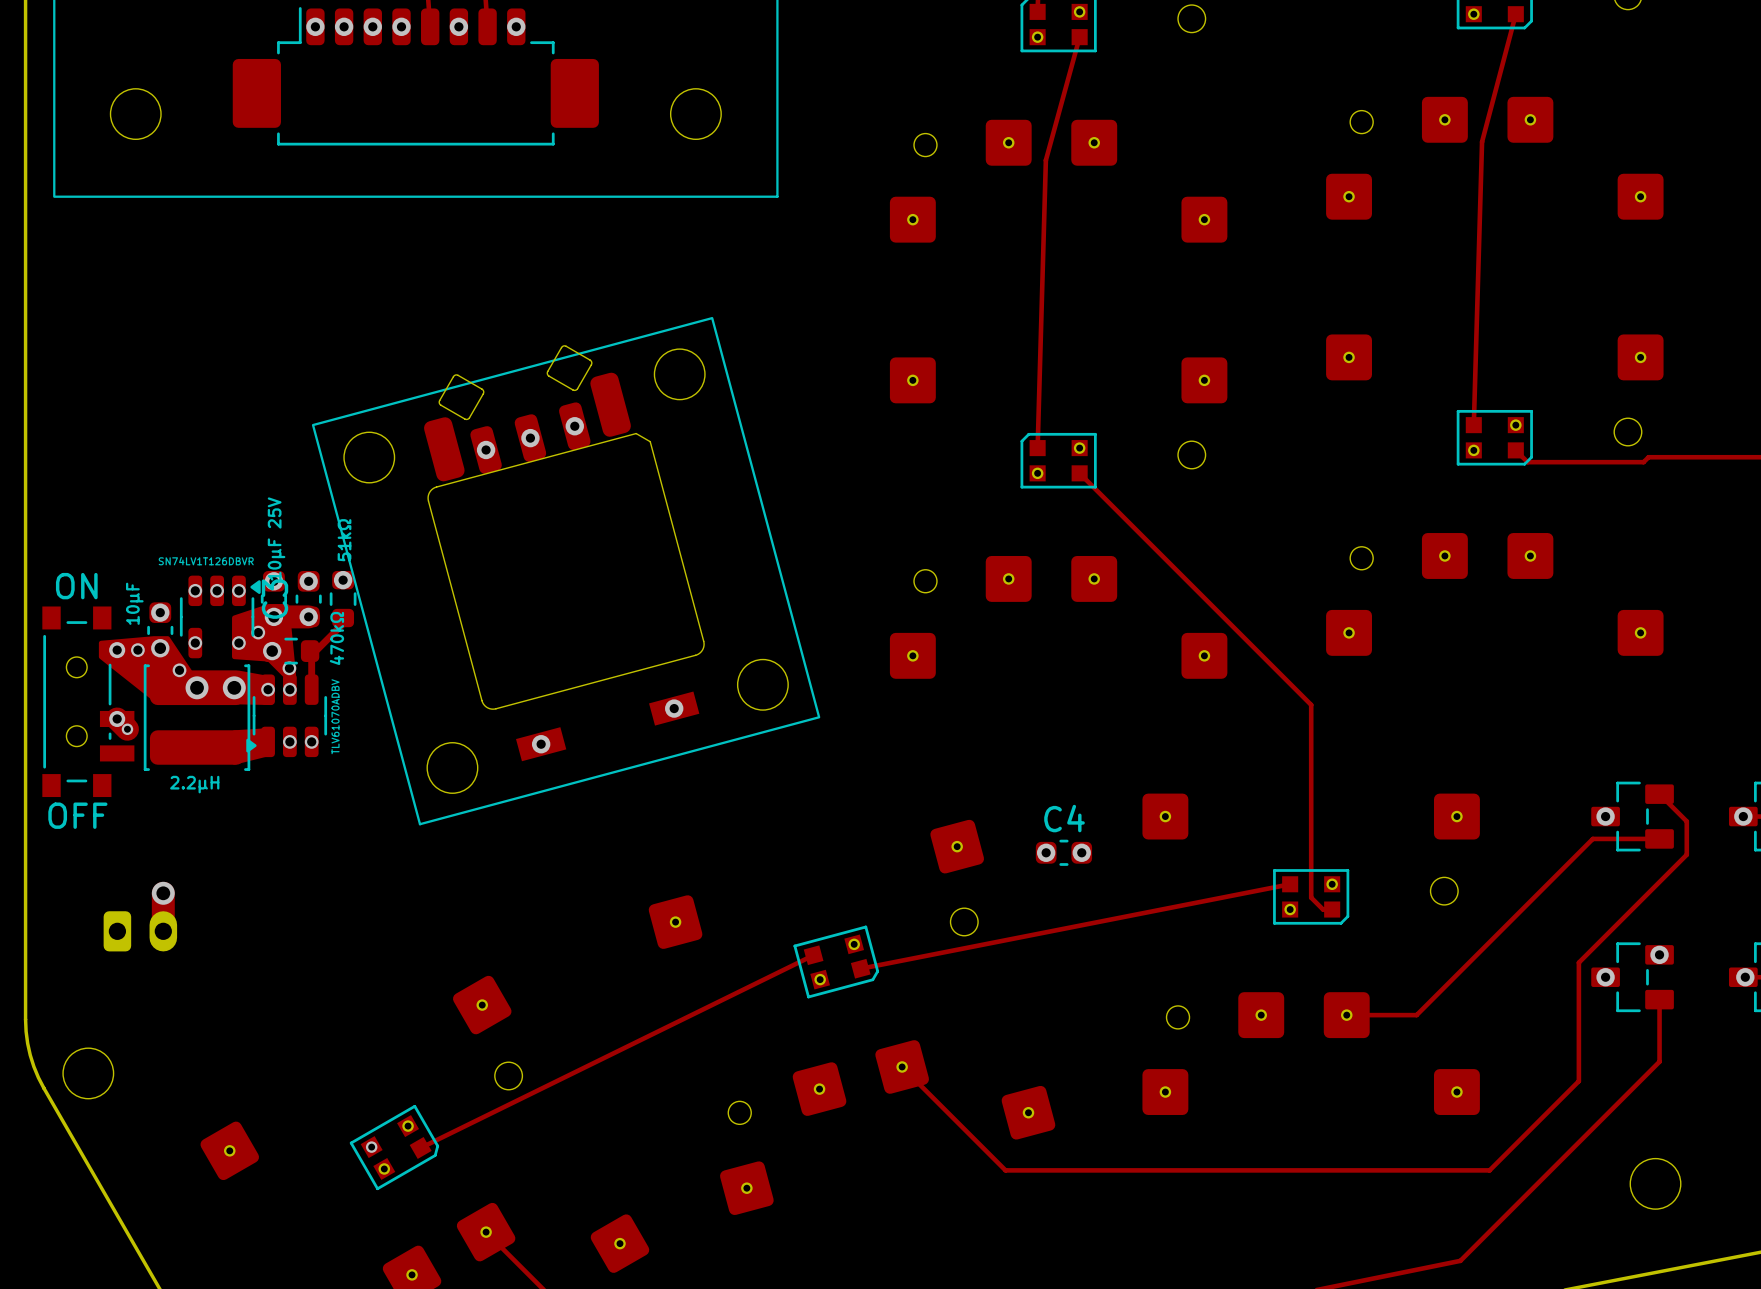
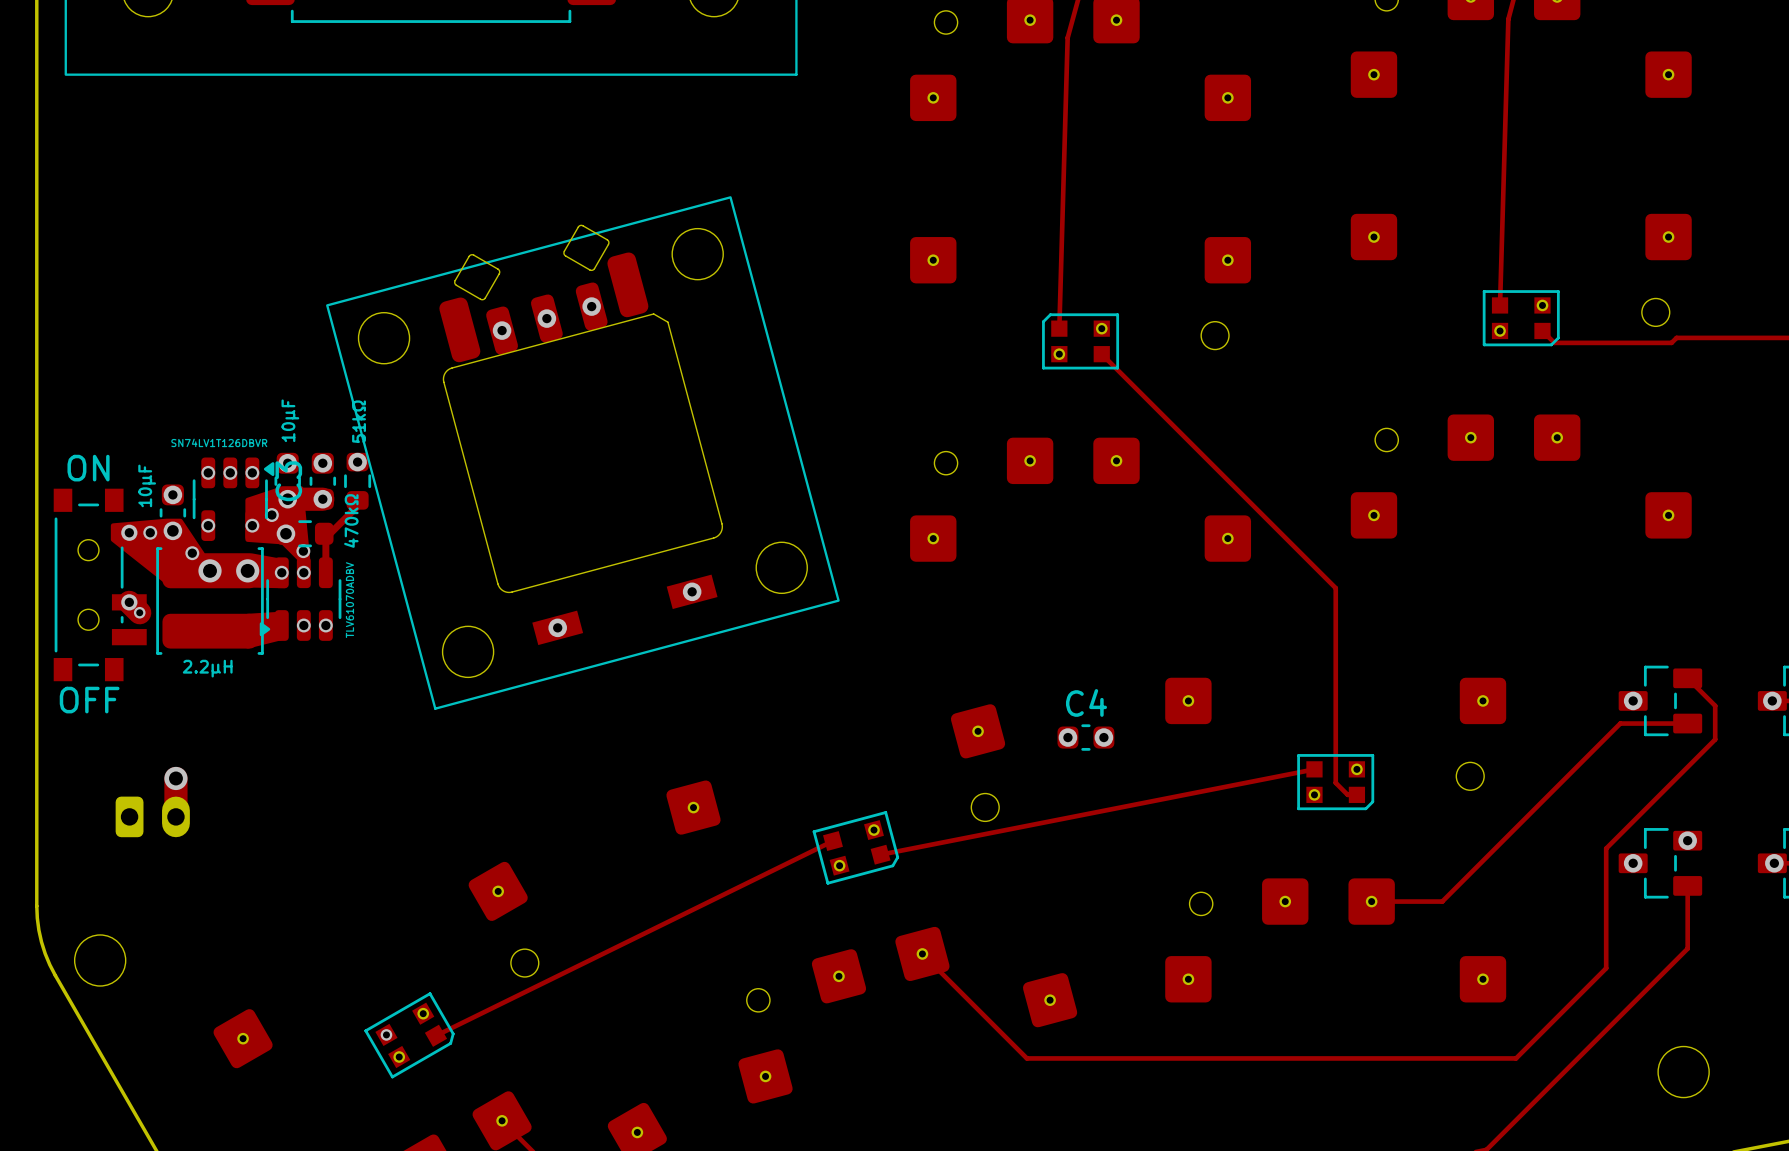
part value: 10μF 25V (276, 538) -> 10μF (290, 420)

